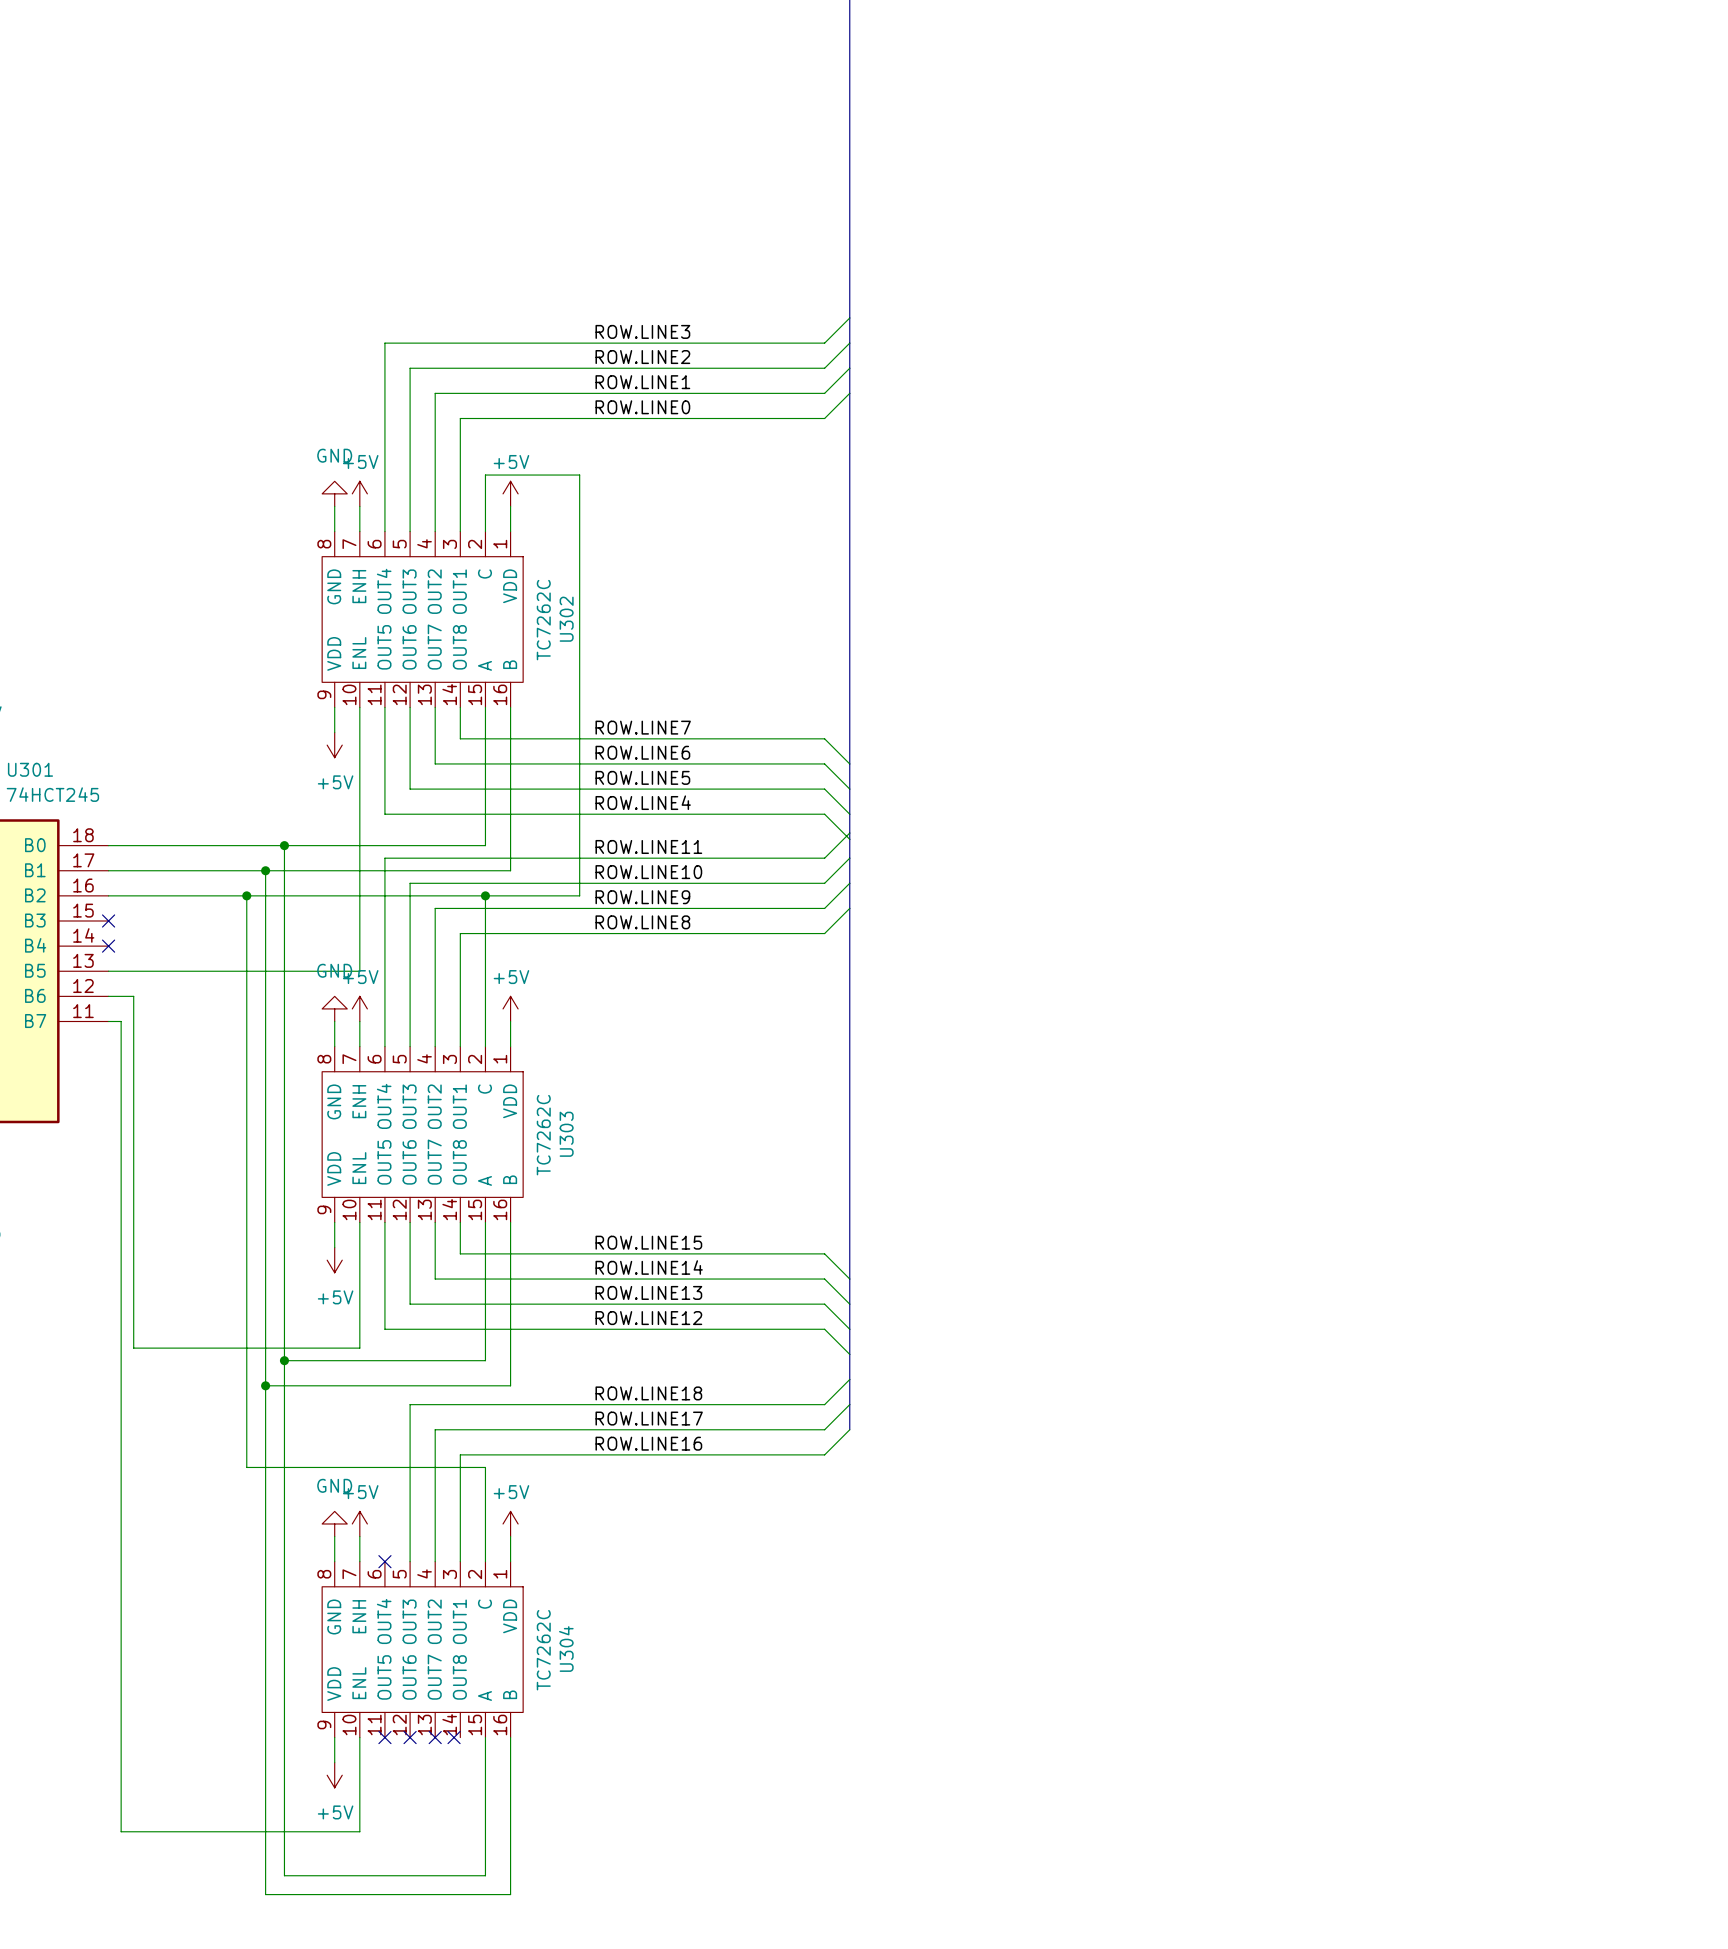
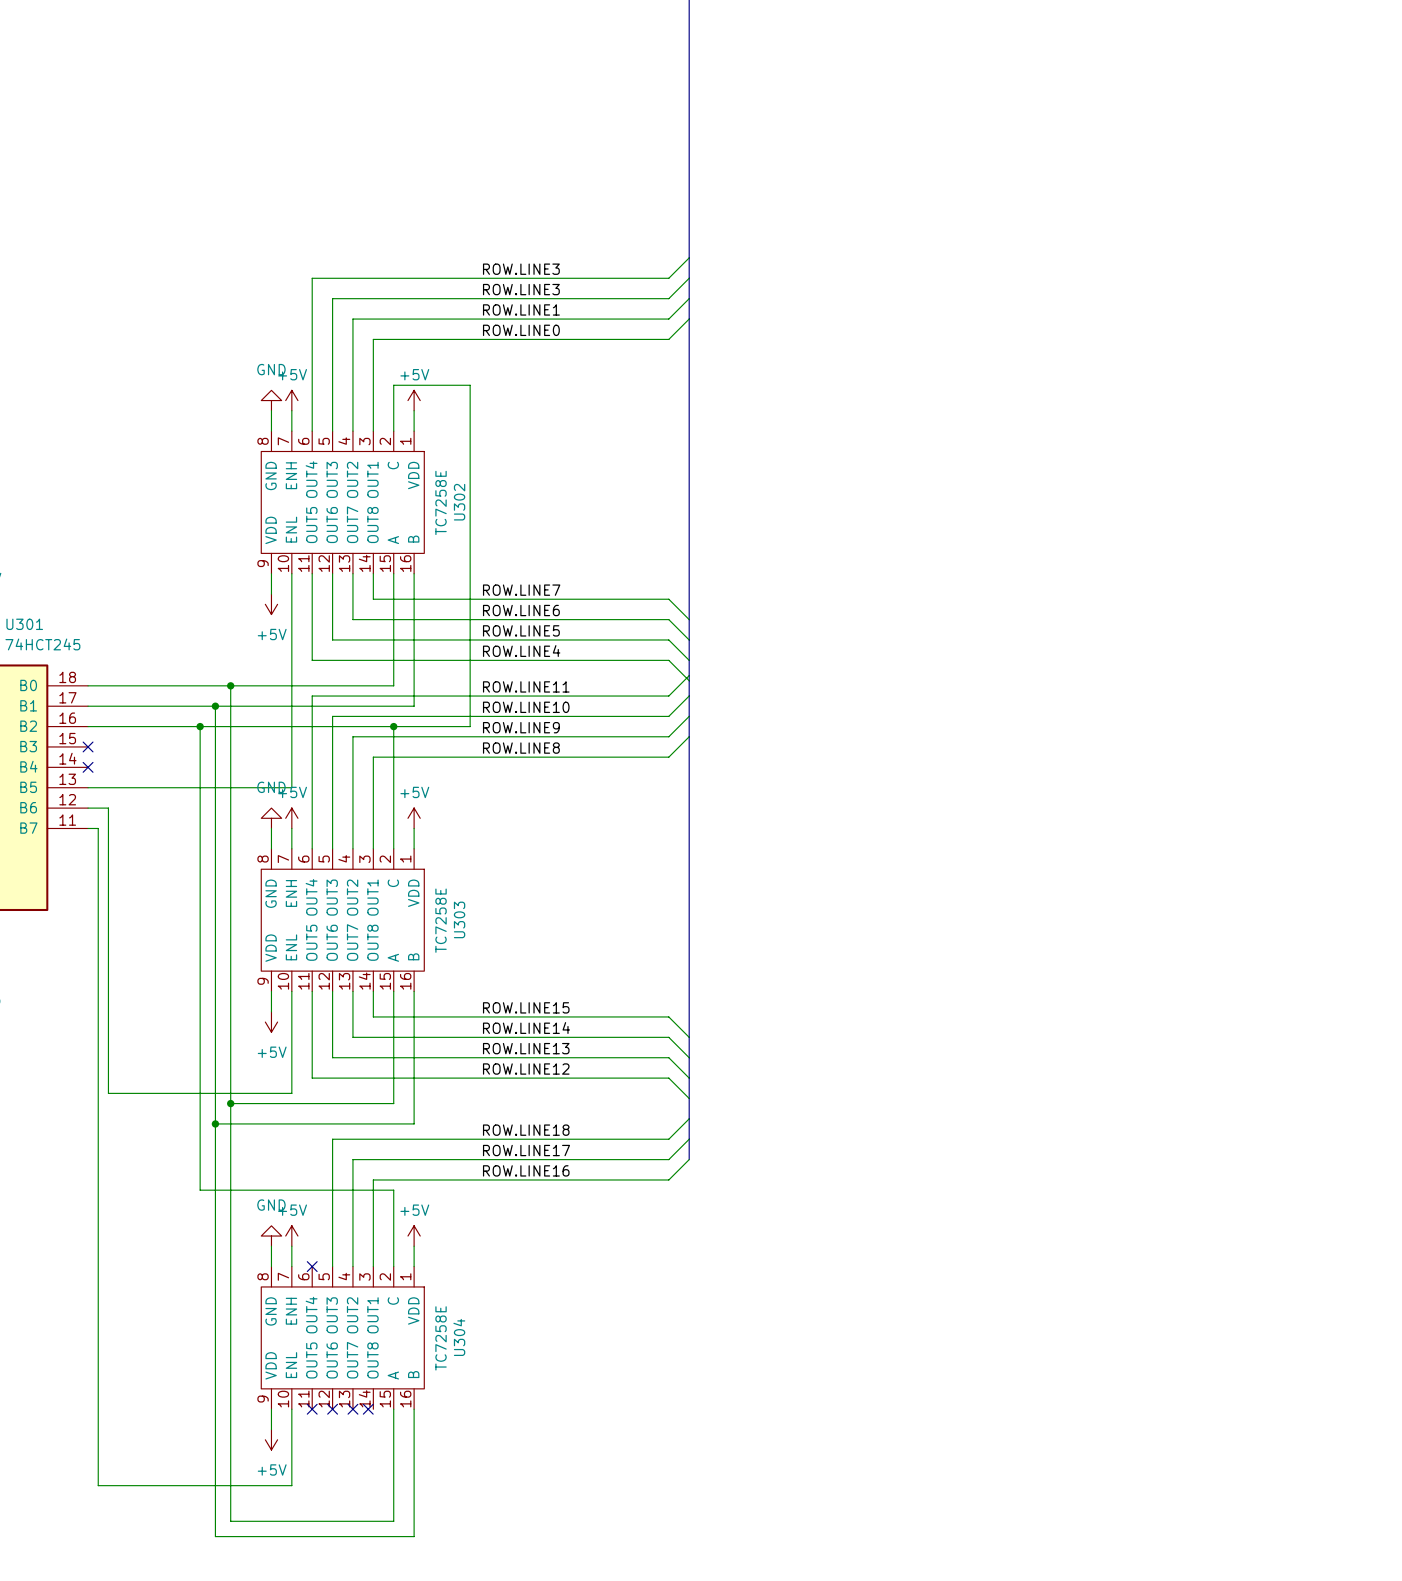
label: ROW.LINE2 (642, 357) -> ROW.LINE3 (521, 289)
U302 value: TC7262C (543, 620) -> TC7258E (441, 502)
U303 value: TC7262C (543, 1135) -> TC7258E (441, 920)
U304 value: TC7262C (543, 1650) -> TC7258E (441, 1338)

